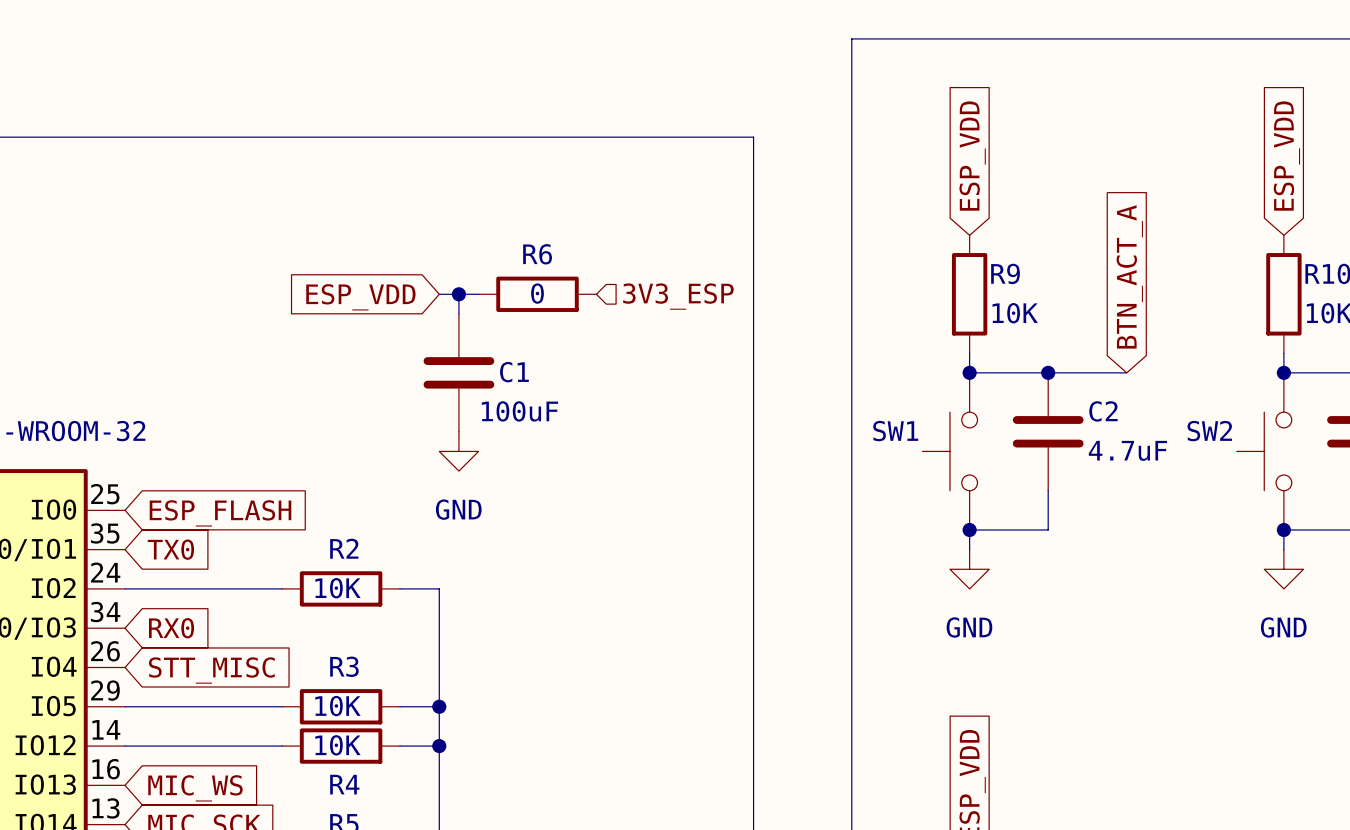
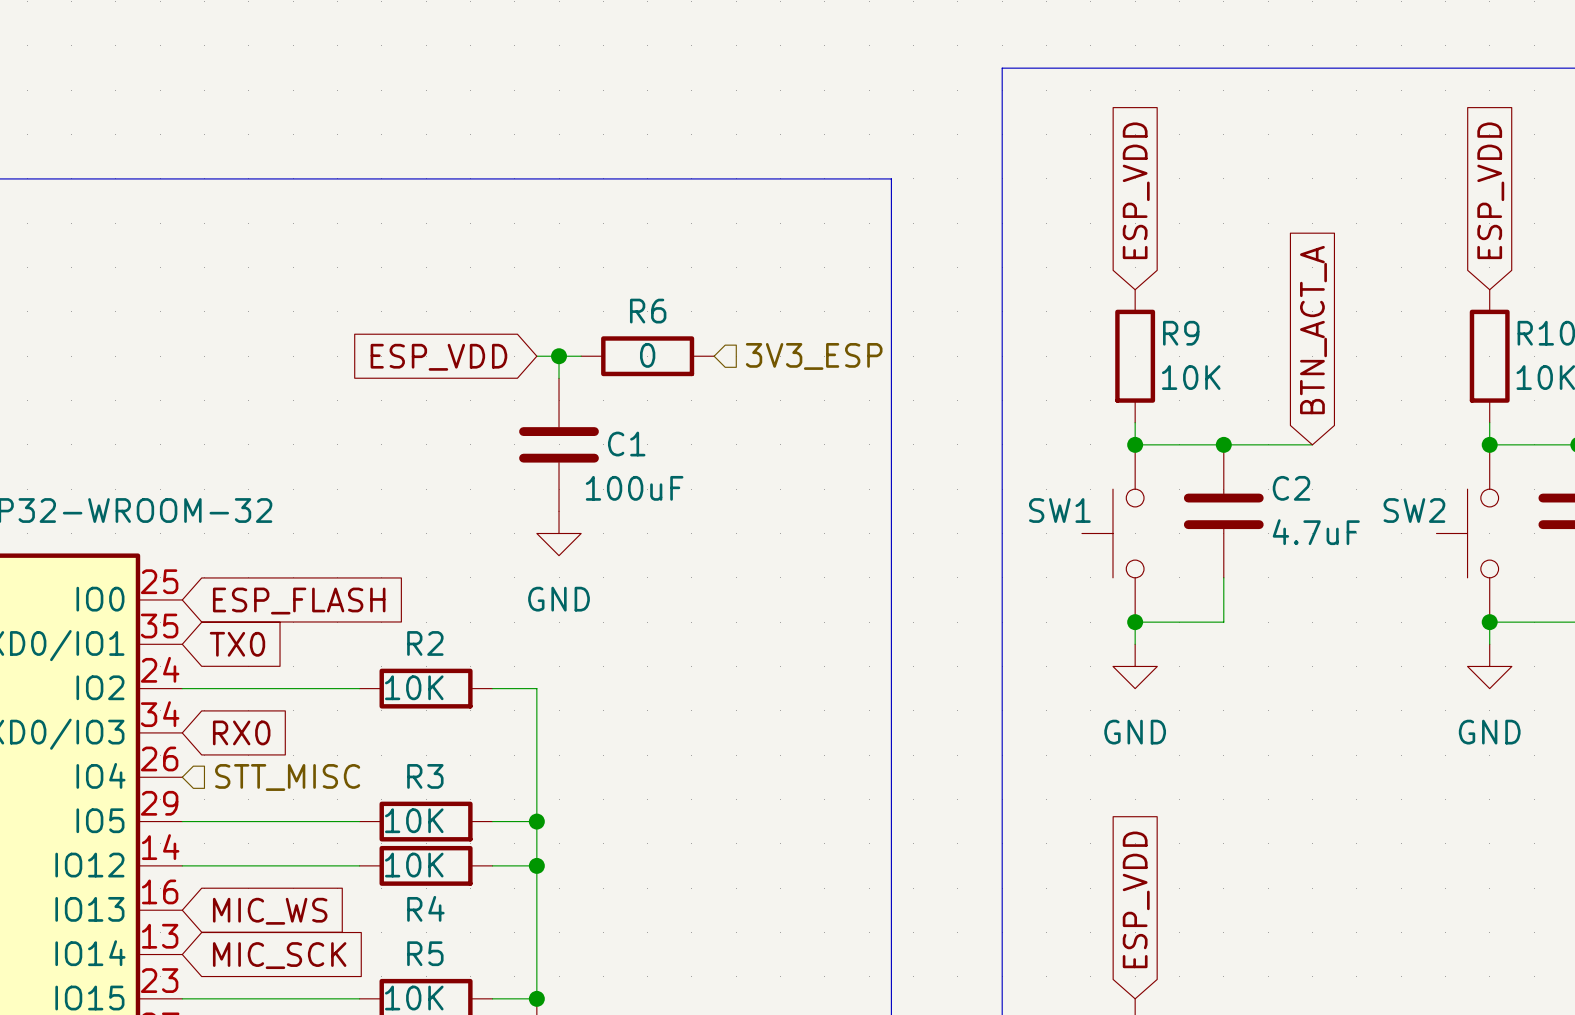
hierarchical label: none -> STT_MISC (287, 777)
global label: STT_MISC (211, 670) -> none

